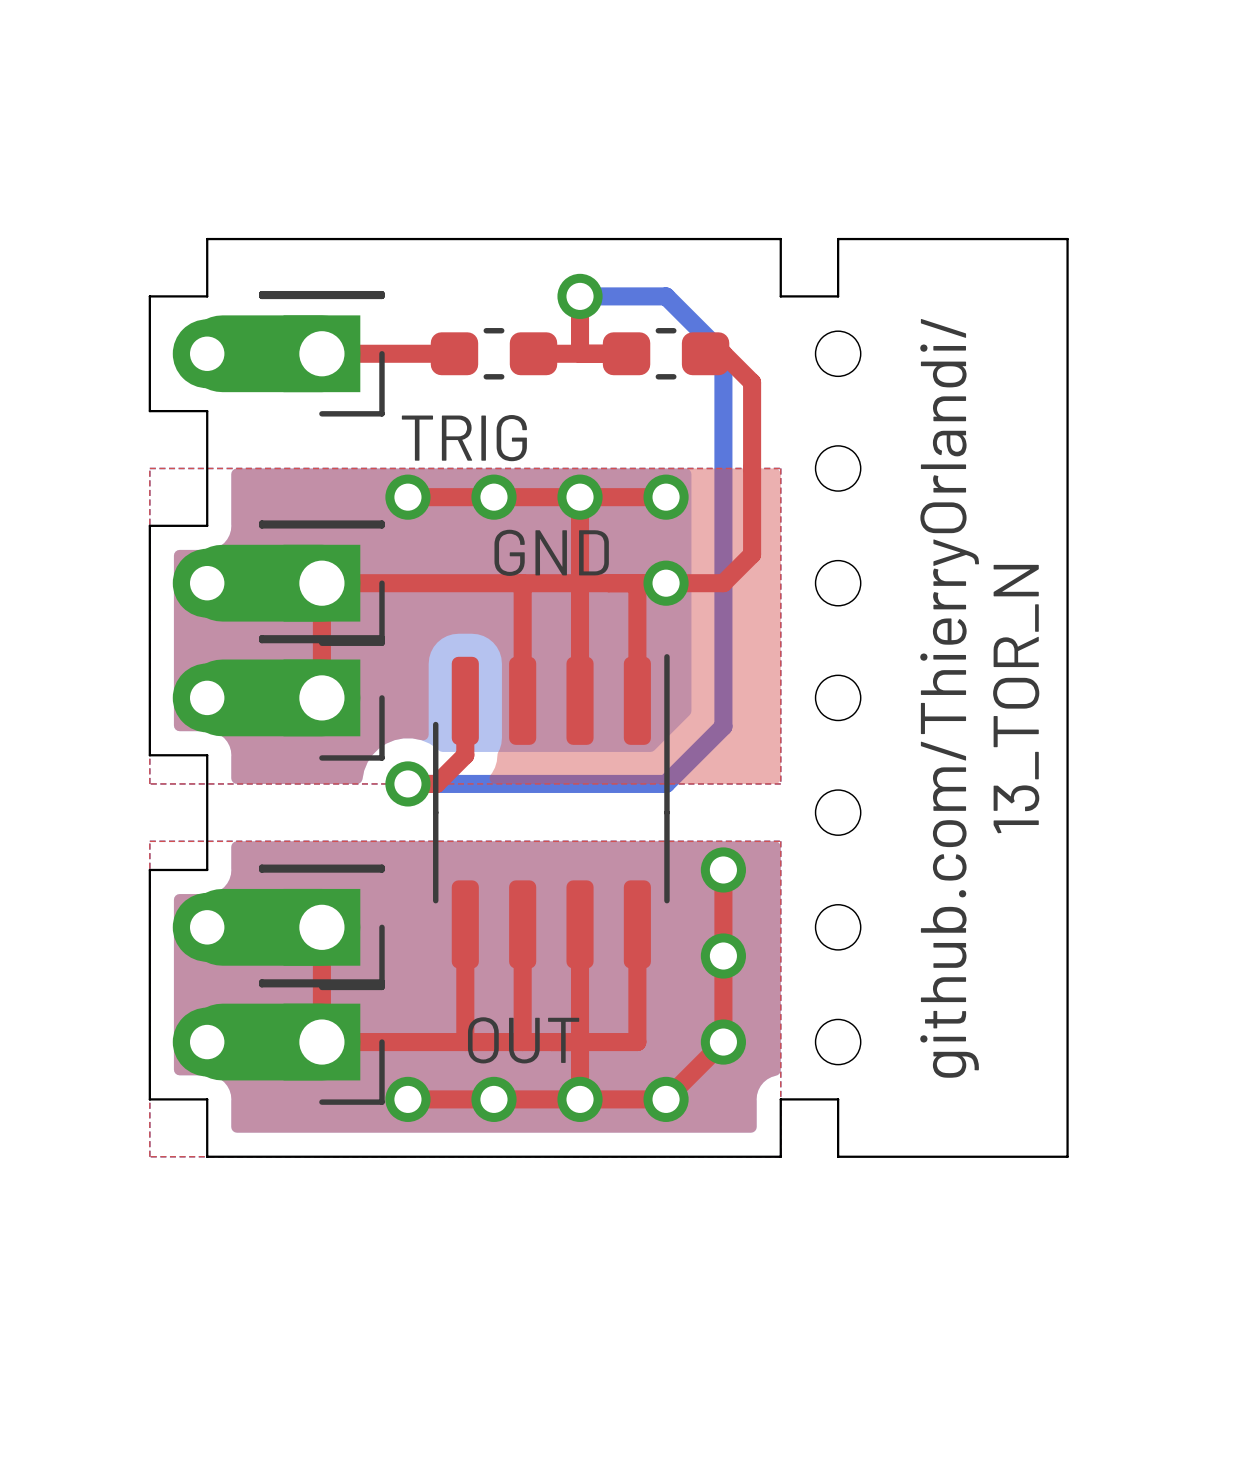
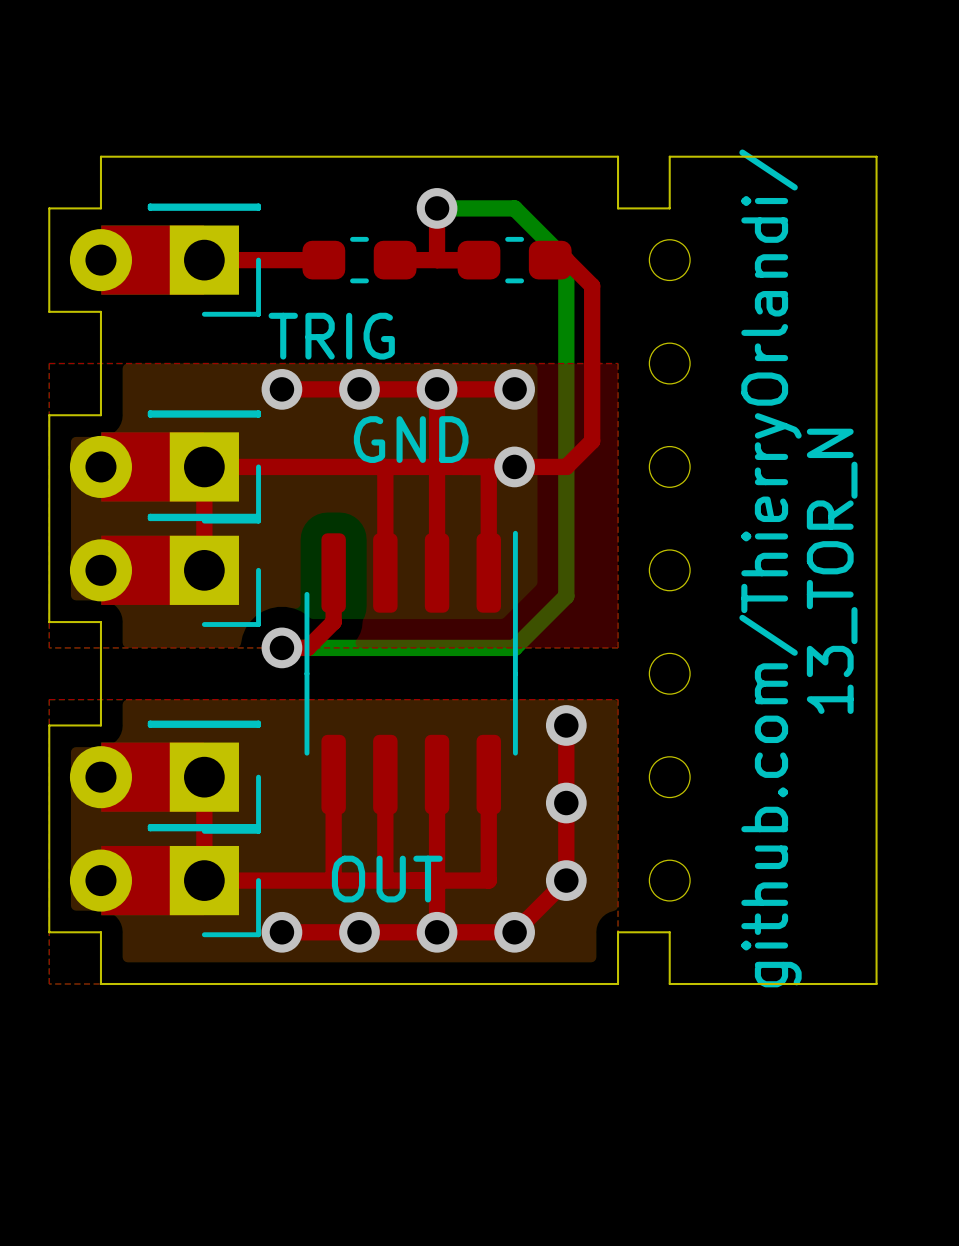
part footprint: [172, 290, 385, 417] -> [69, 203, 261, 317]
part footprint: [172, 520, 385, 646] -> [69, 410, 261, 524]
part footprint: [172, 635, 385, 761] -> [69, 513, 261, 627]
part footprint: [172, 864, 385, 991] -> [69, 720, 261, 834]
part footprint: [172, 979, 385, 1105] -> [69, 823, 261, 938]

